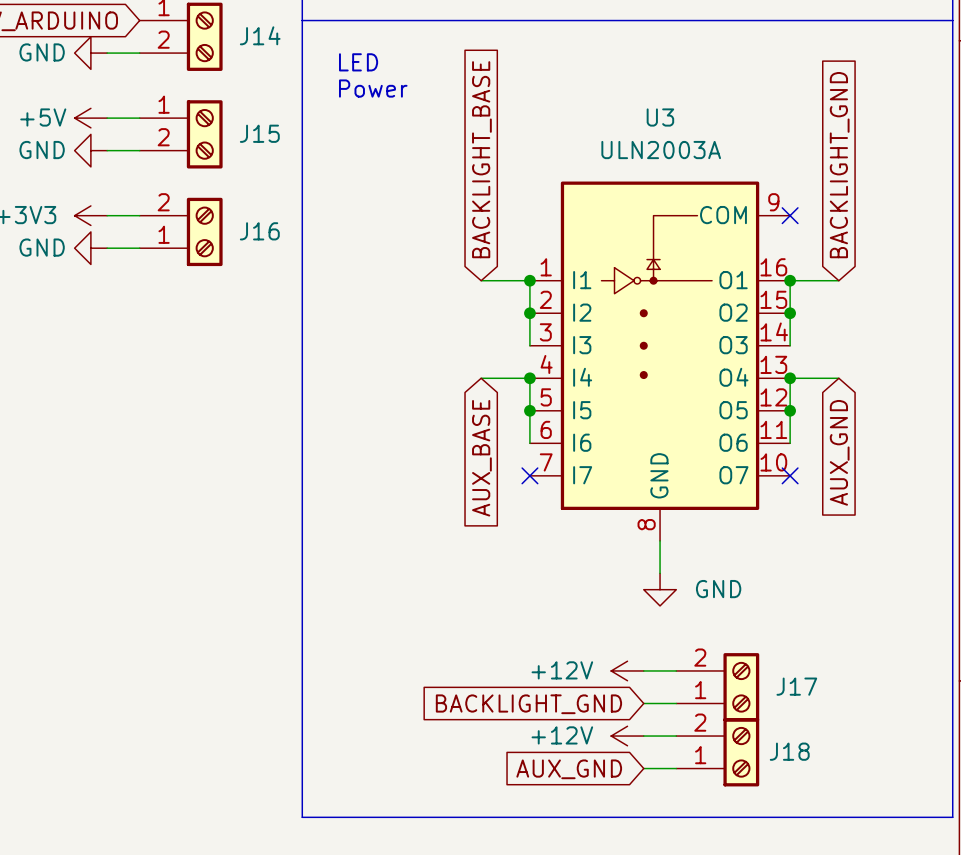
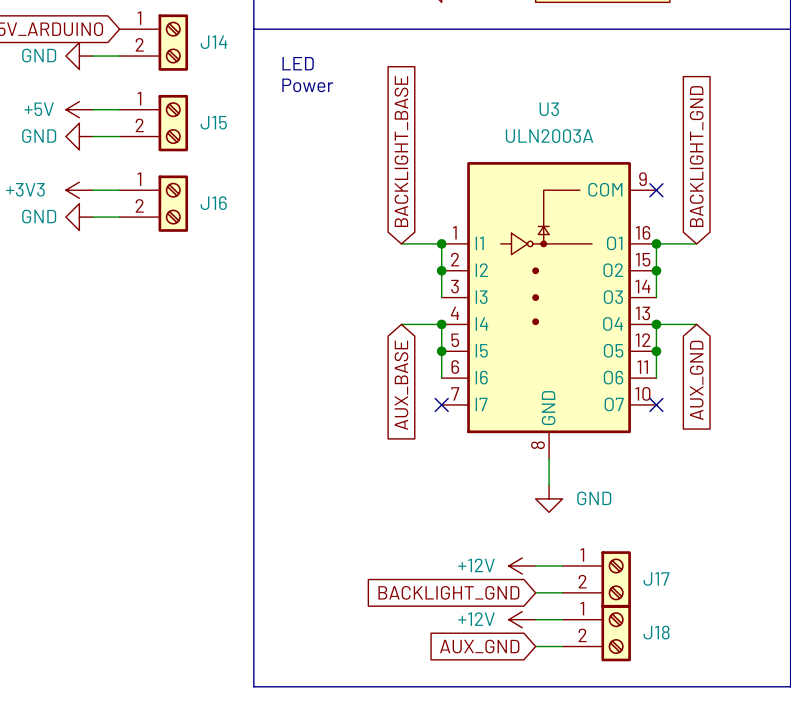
J16 flip: as is (204, 231) -> up-down (173, 203)
J17 flip: as is (741, 687) -> up-down (616, 579)
J18 flip: as is (741, 752) -> up-down (616, 633)

